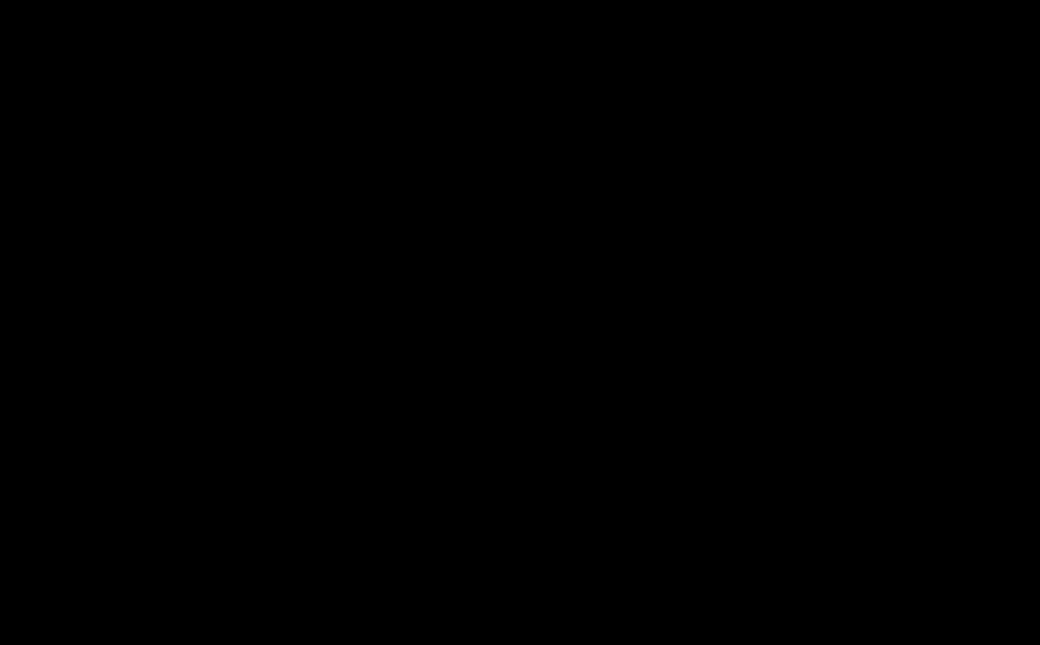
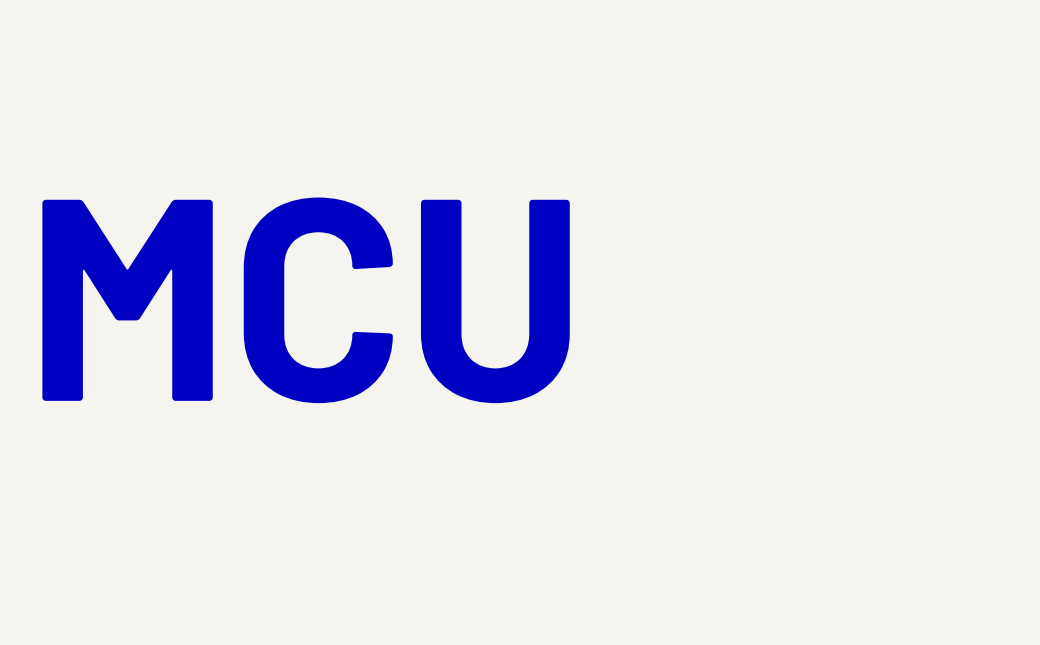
text: none -> MCU (306, 300)

